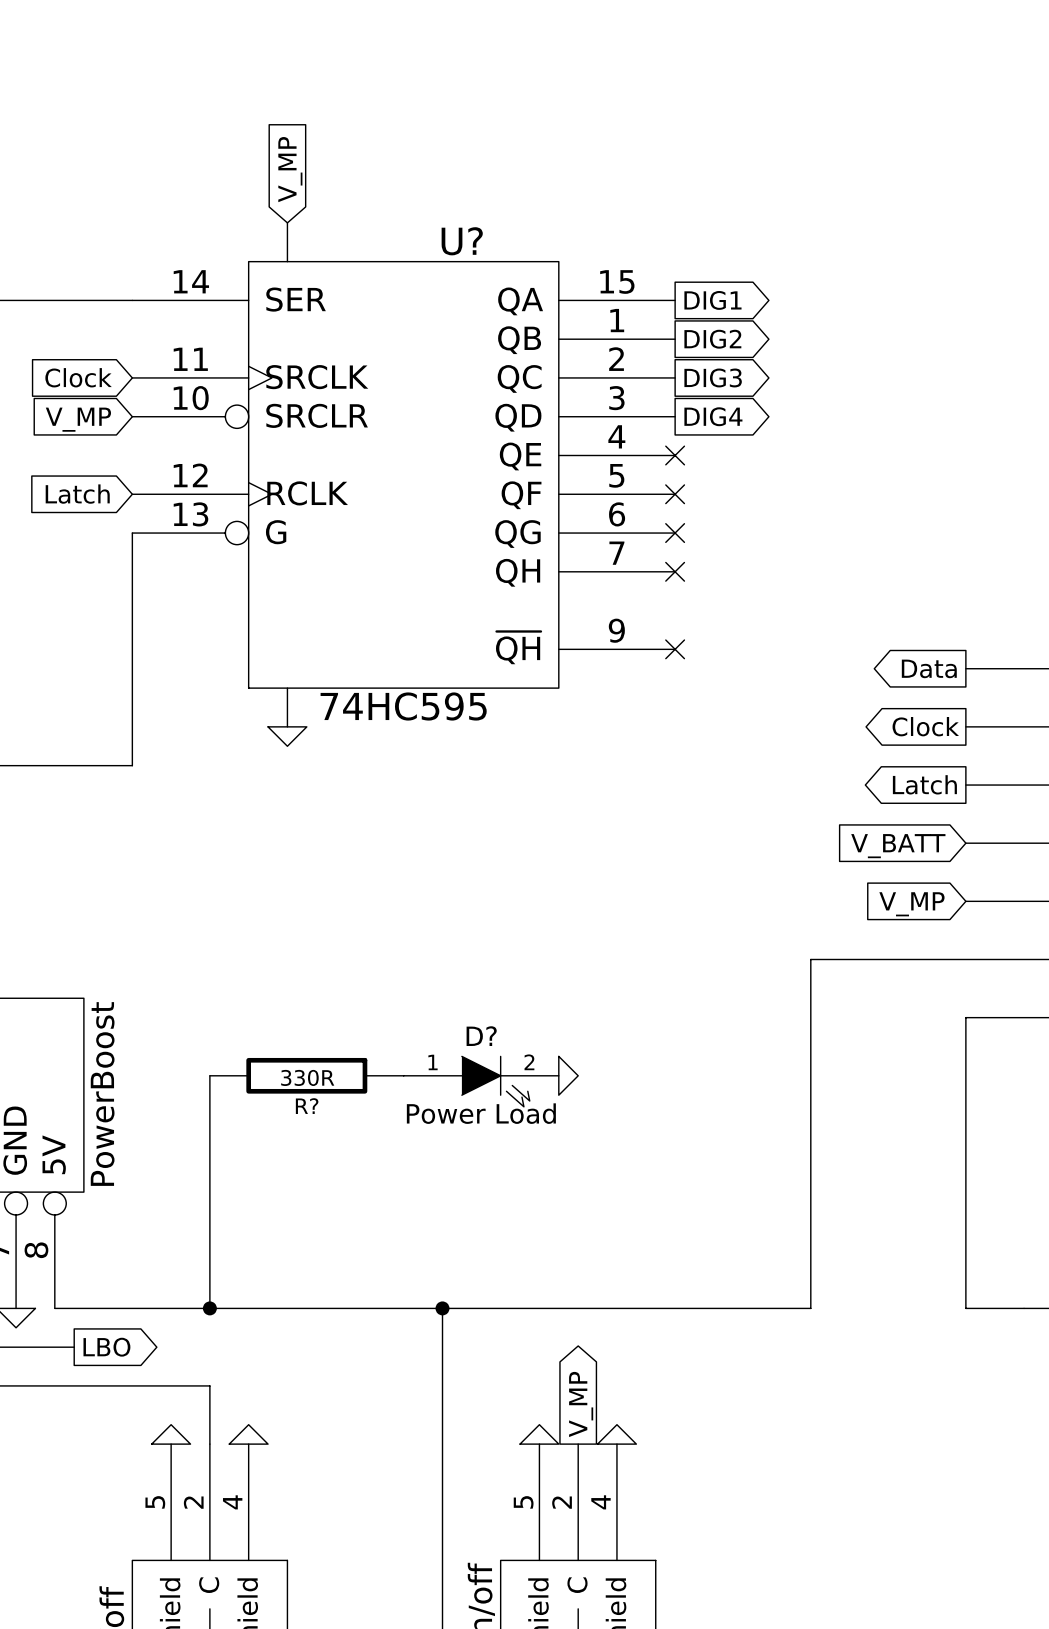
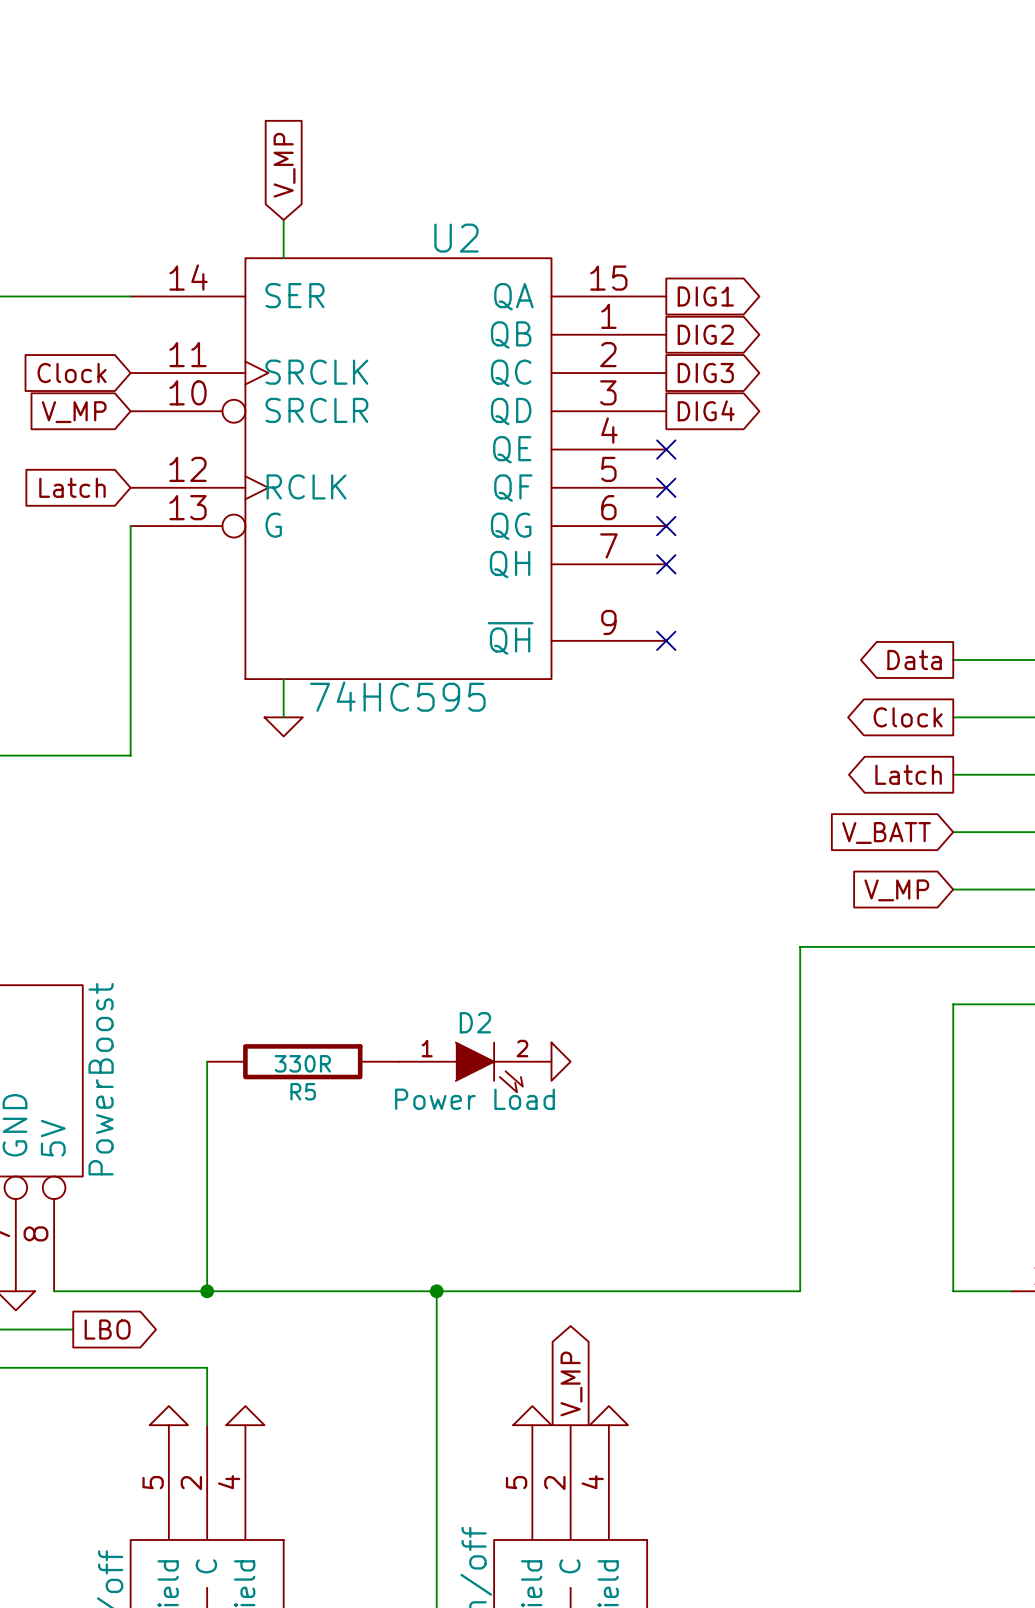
U? name: U? (462, 241) -> U2 (456, 238)
D? name: D? (481, 1036) -> D2 (475, 1022)
R? name: R? (307, 1106) -> R5 (303, 1091)

